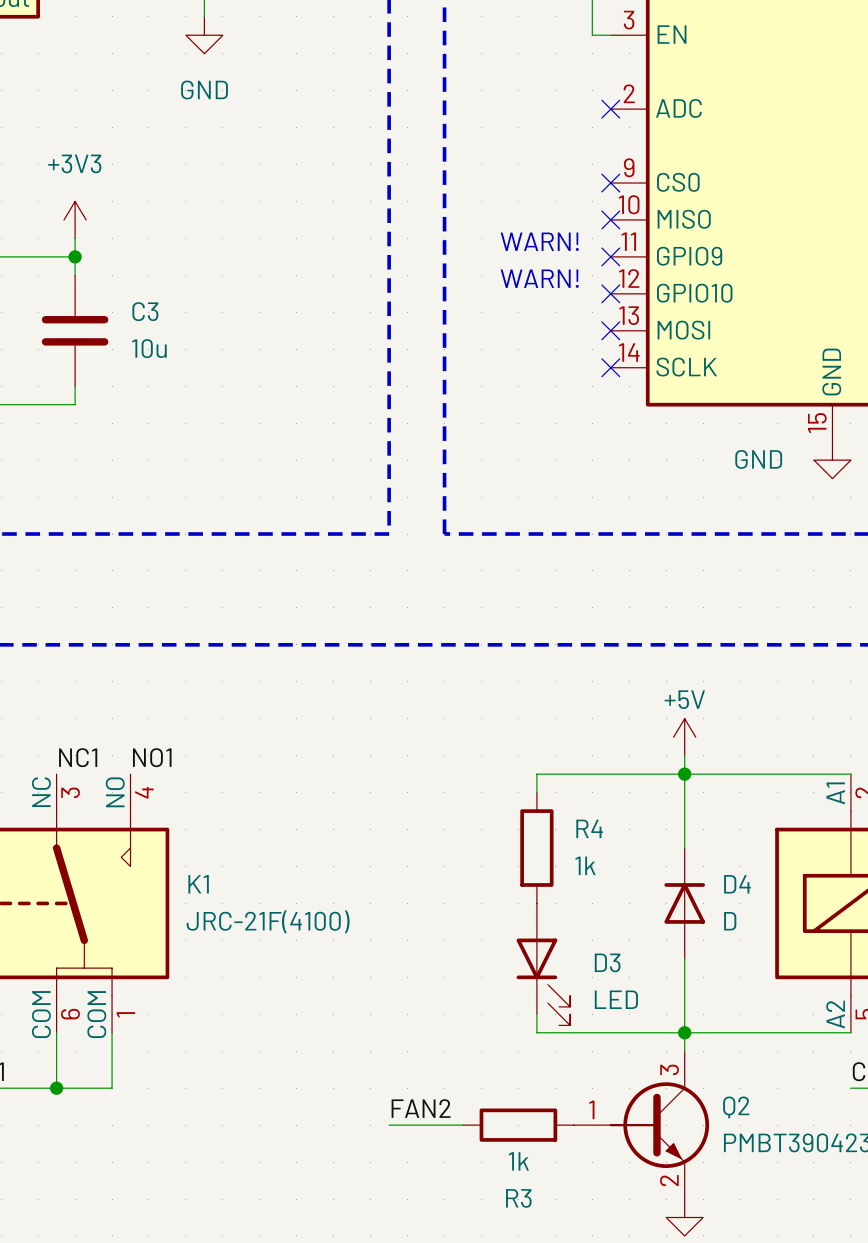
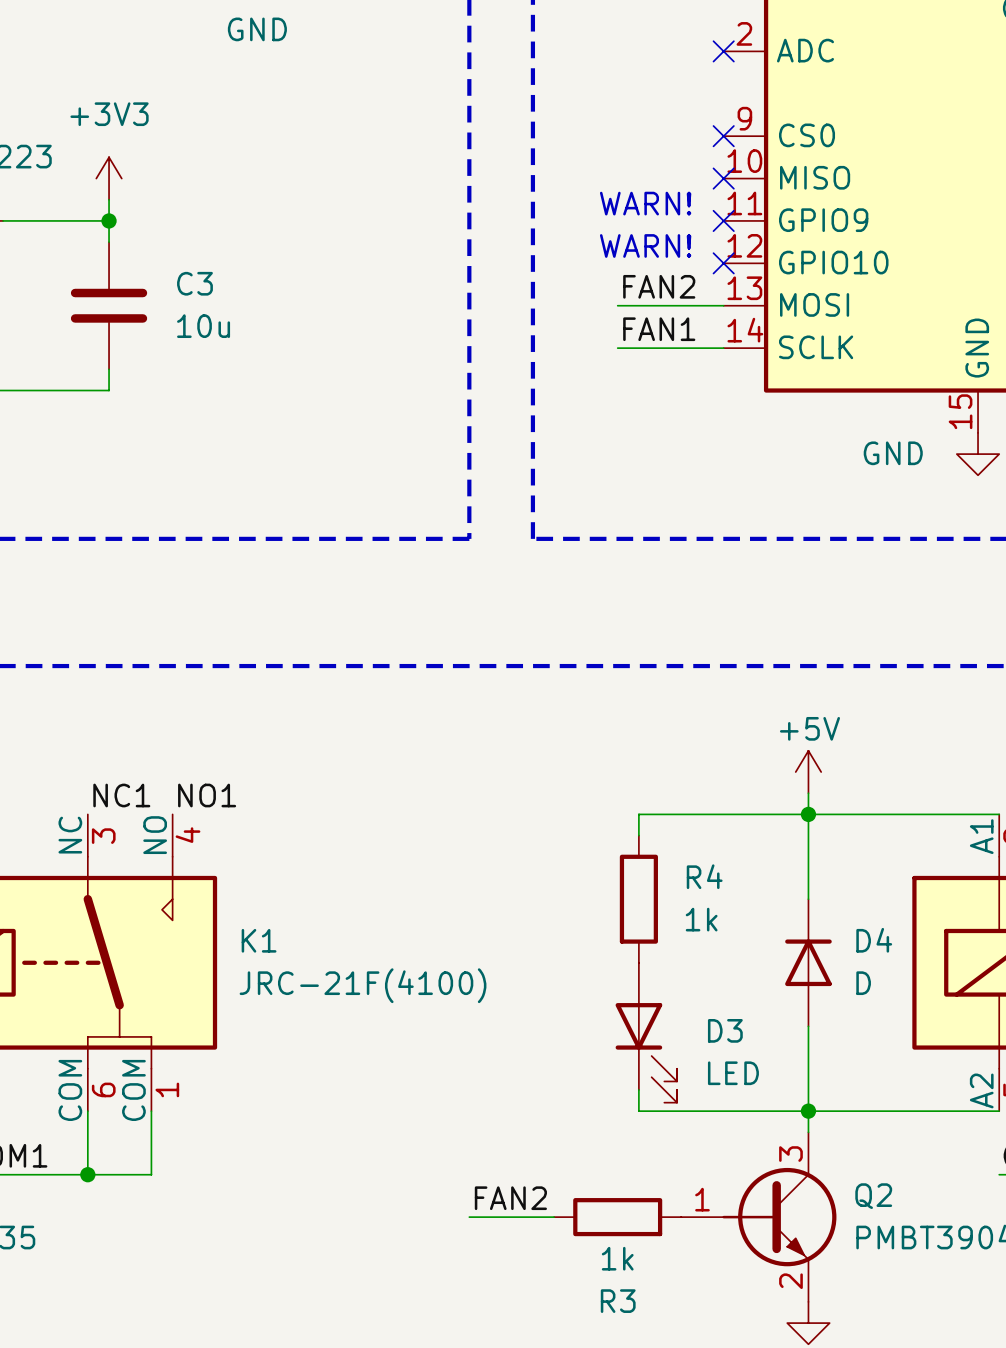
label: none -> FAN2 (659, 286)
wire: none -> (617, 305) (723, 305)
no-connect mark: (610, 330) -> none
label: none -> FAN1 (659, 329)
wire: none -> (617, 348) (723, 348)
no-connect mark: (610, 367) -> none

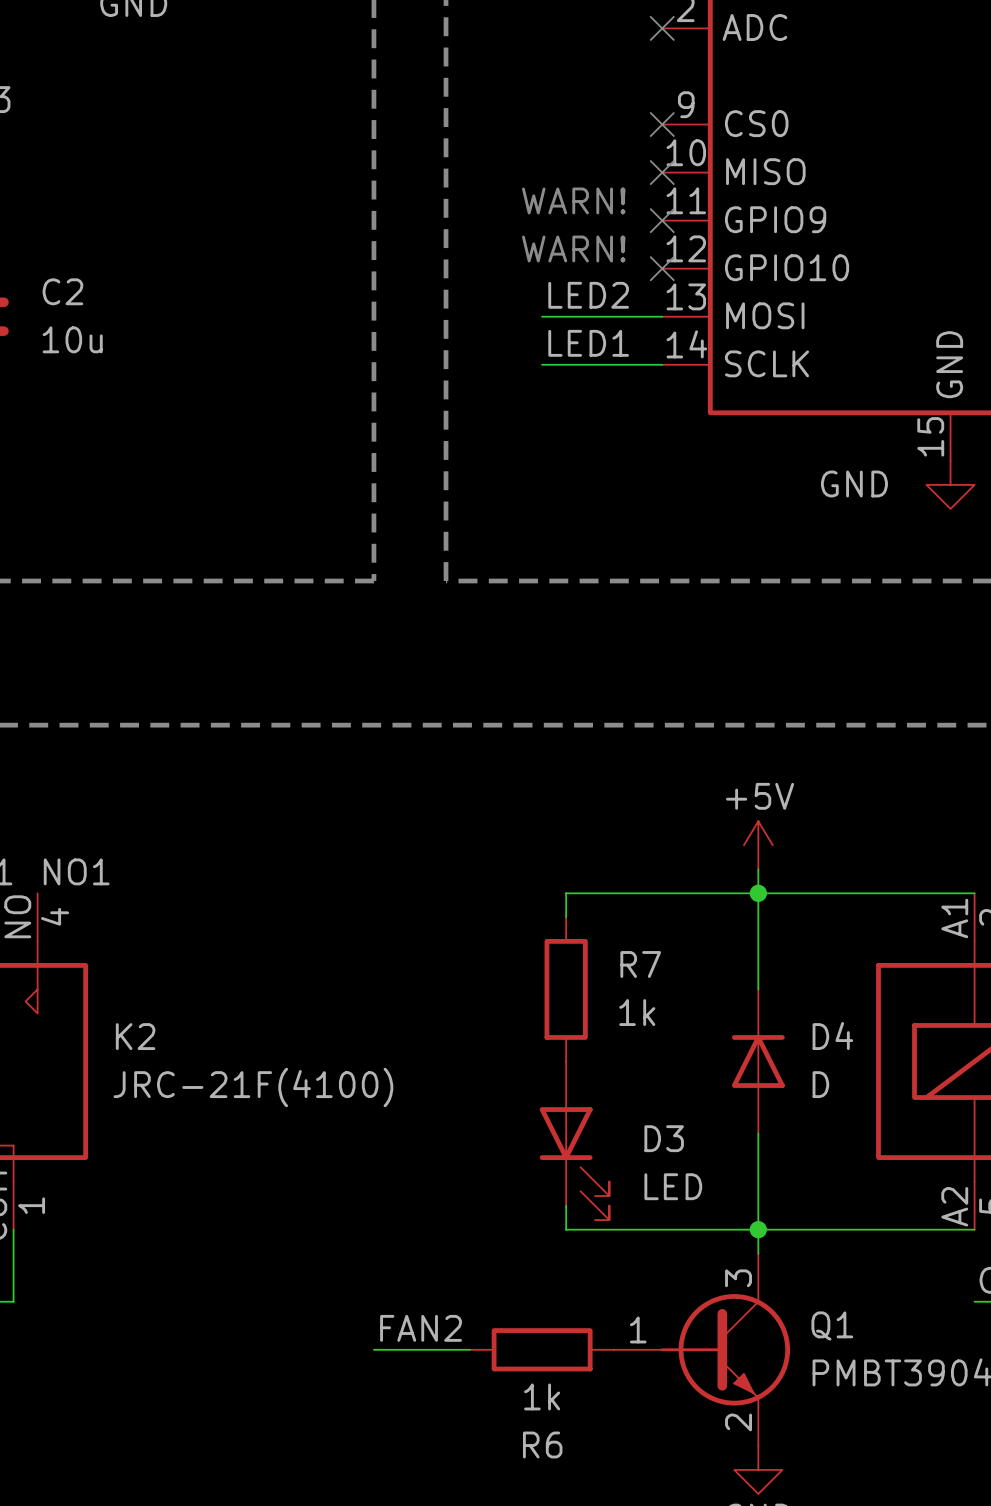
C3 name: C3 (194, 283) -> C2 (62, 291)
label: FAN2 (659, 286) -> LED2 (588, 295)
label: FAN1 (659, 329) -> LED1 (588, 343)
R4 name: R4 (704, 876) -> R7 (640, 964)
K1 name: K1 (259, 940) -> K2 (135, 1036)
Q2 name: Q2 (873, 1196) -> Q1 (832, 1326)
R3 name: R3 (618, 1301) -> R6 (542, 1445)

